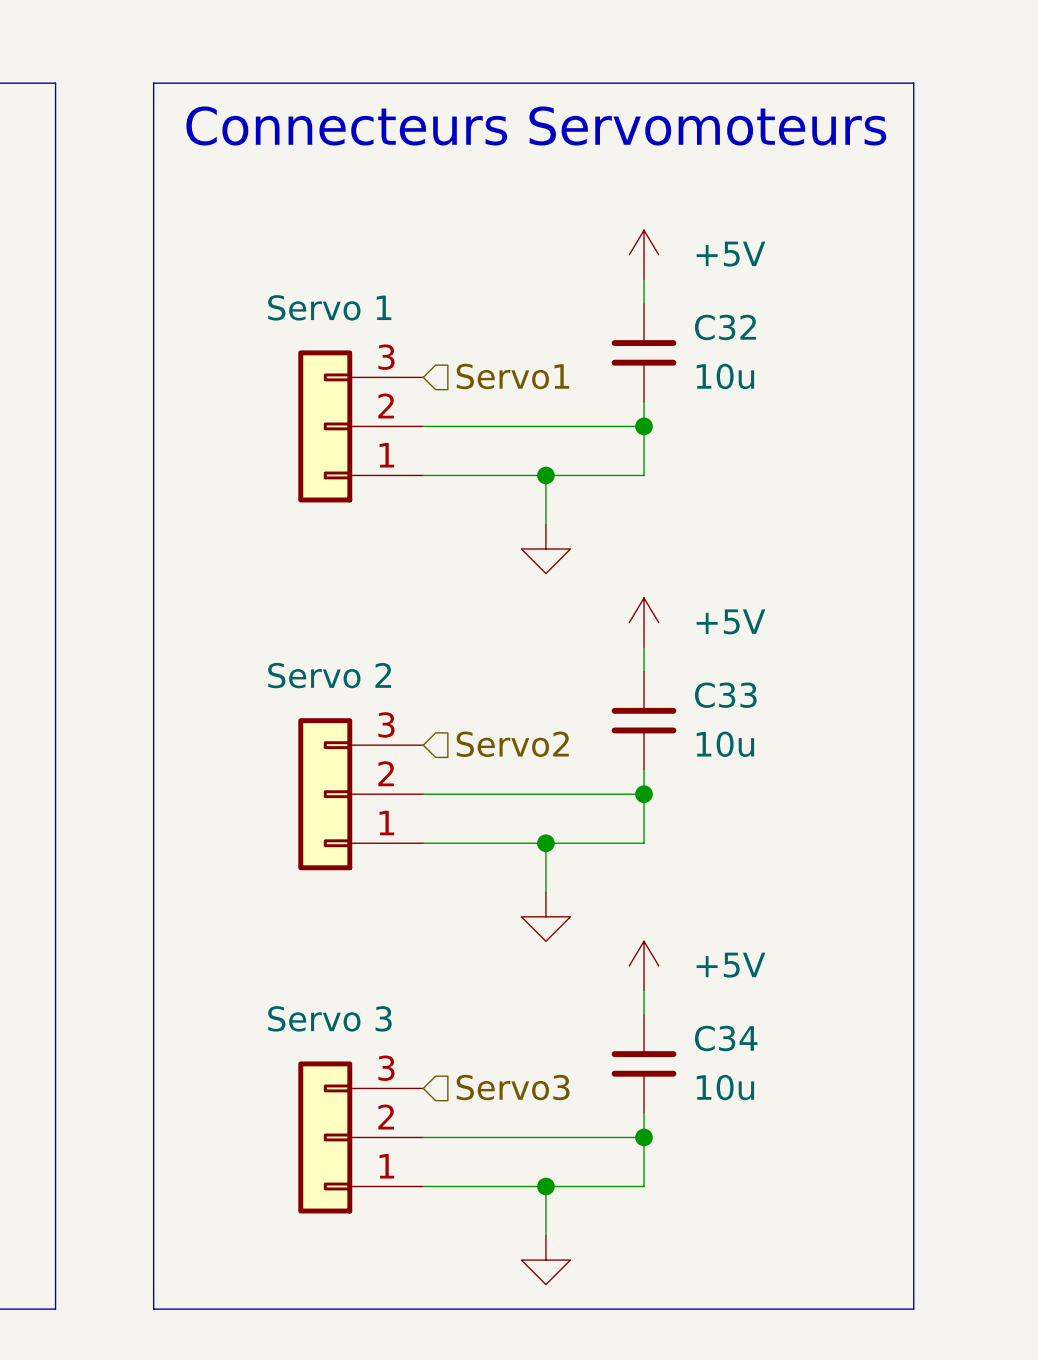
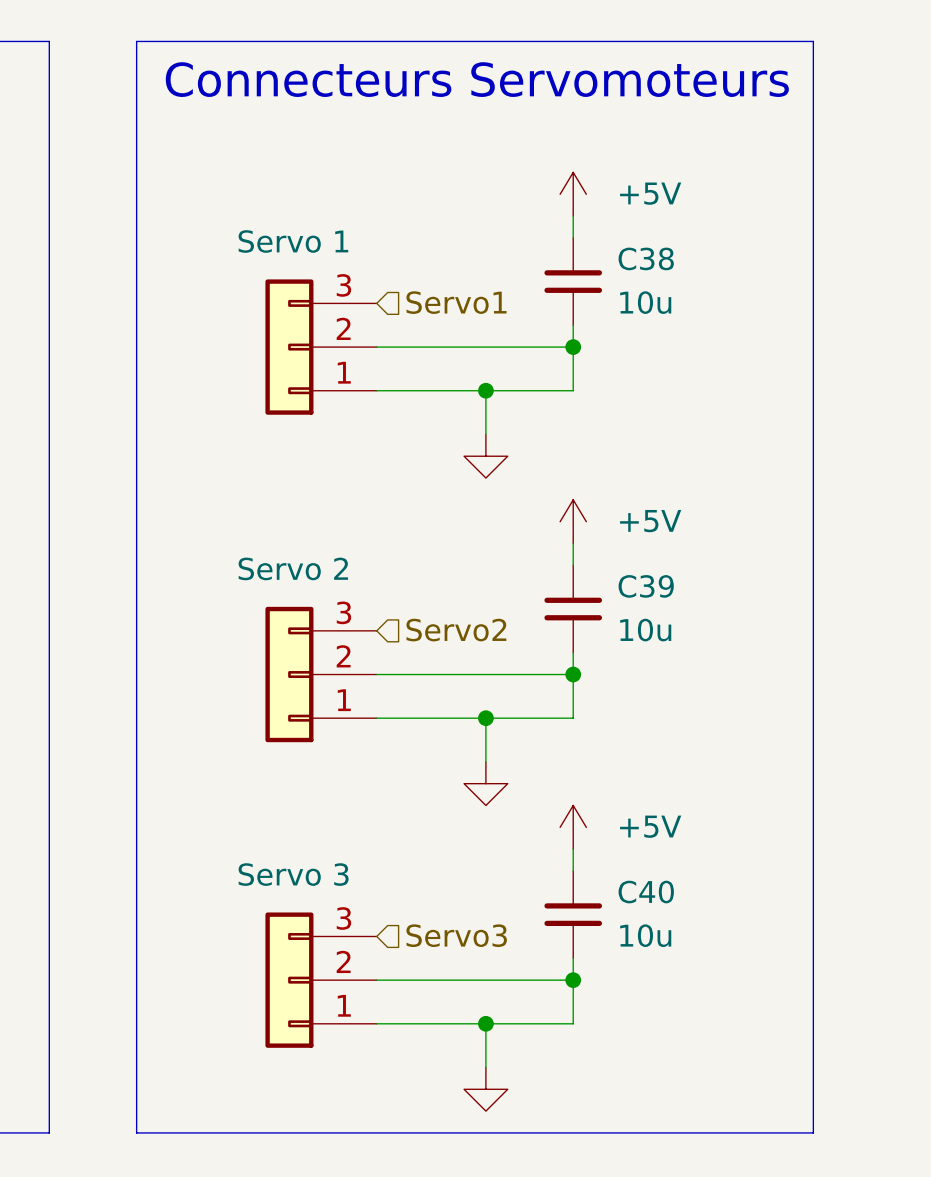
C32 name: C32 (725, 327) -> C38 (646, 258)
C33 name: C33 (725, 695) -> C39 (646, 586)
C34 name: C34 (726, 1038) -> C40 (646, 892)

